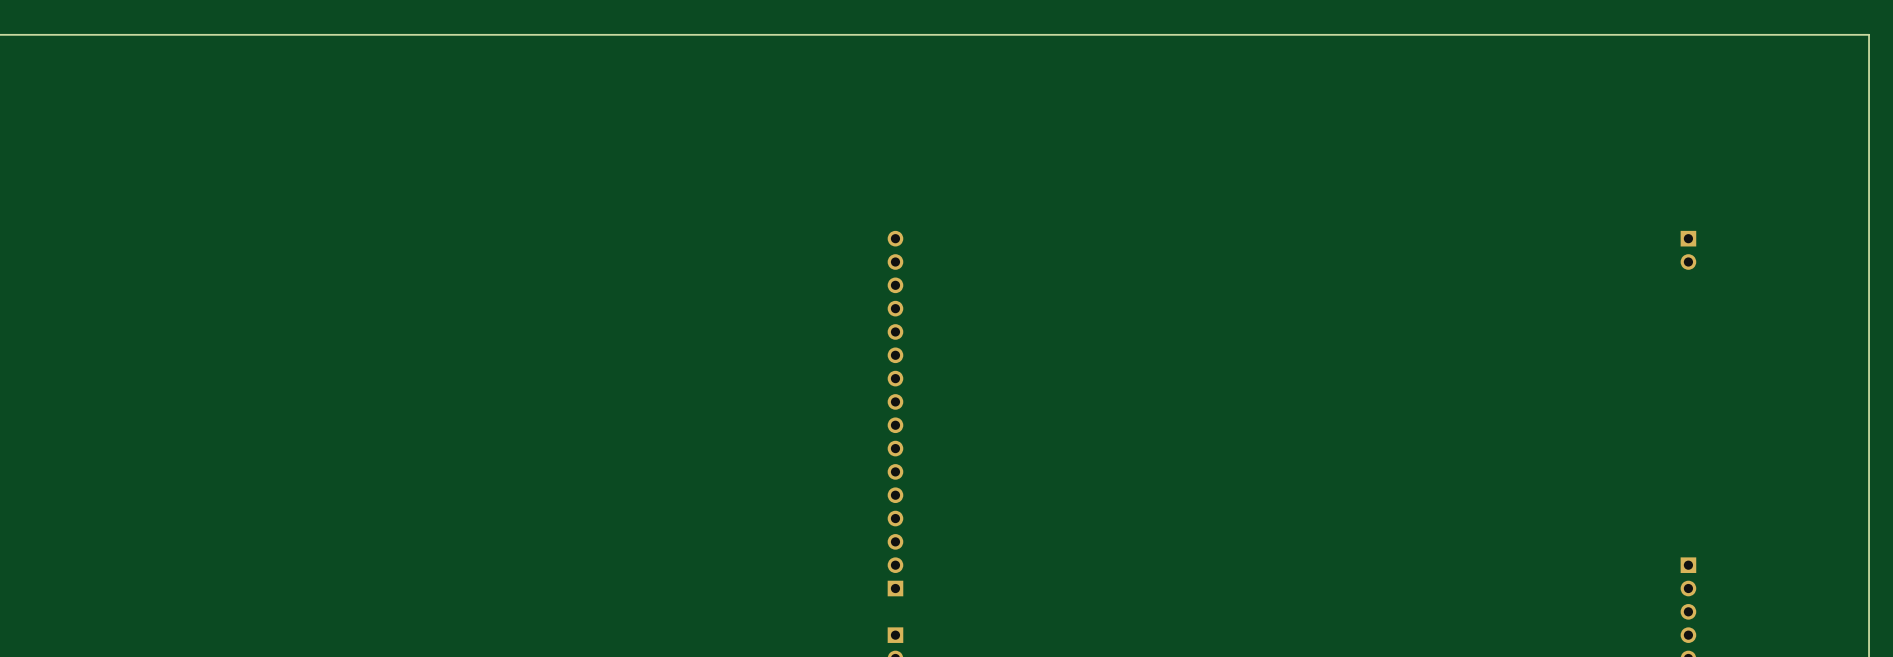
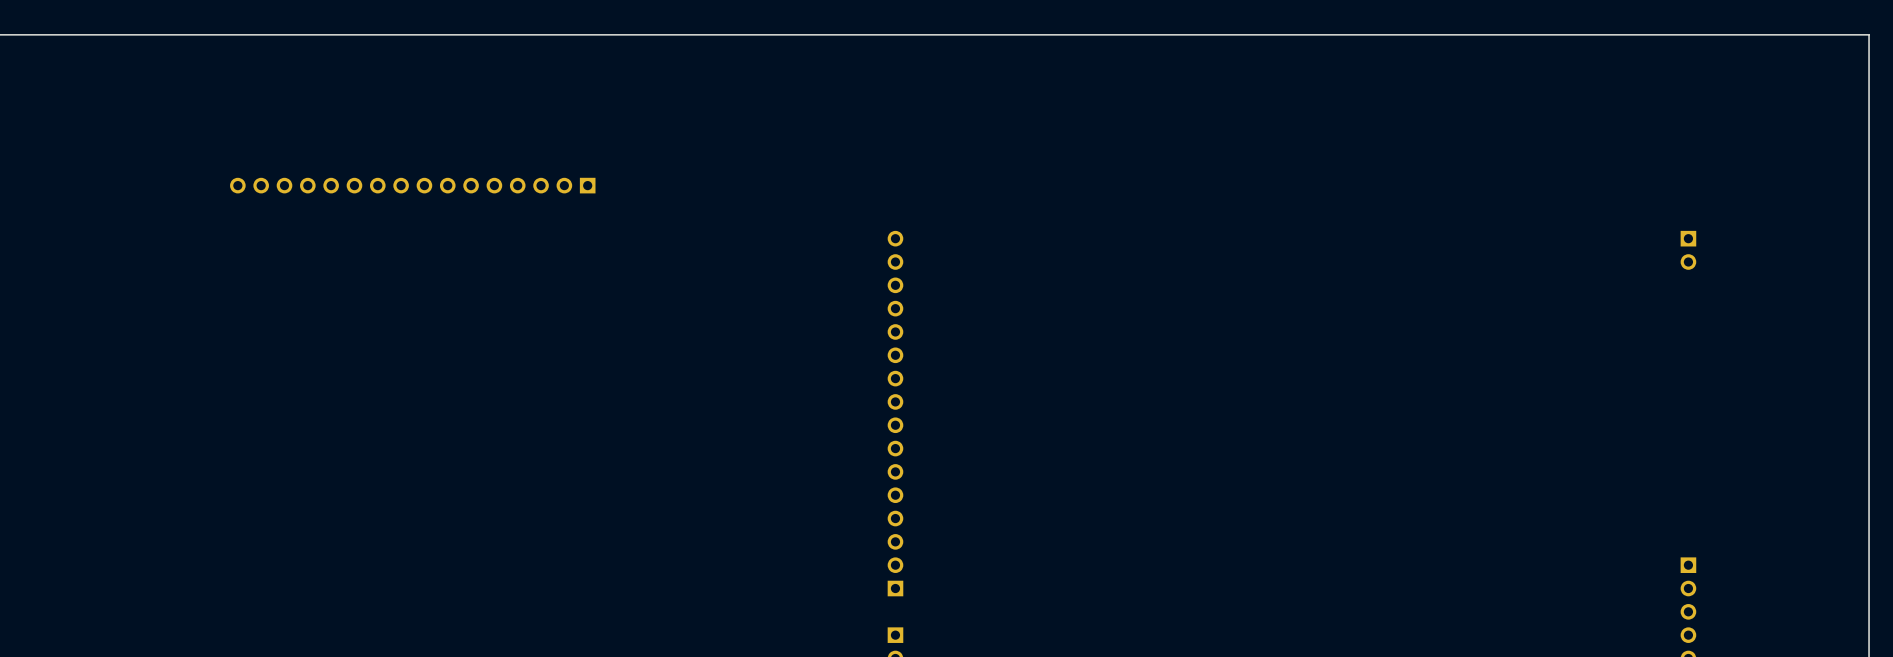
part: none -> (412, 185)

